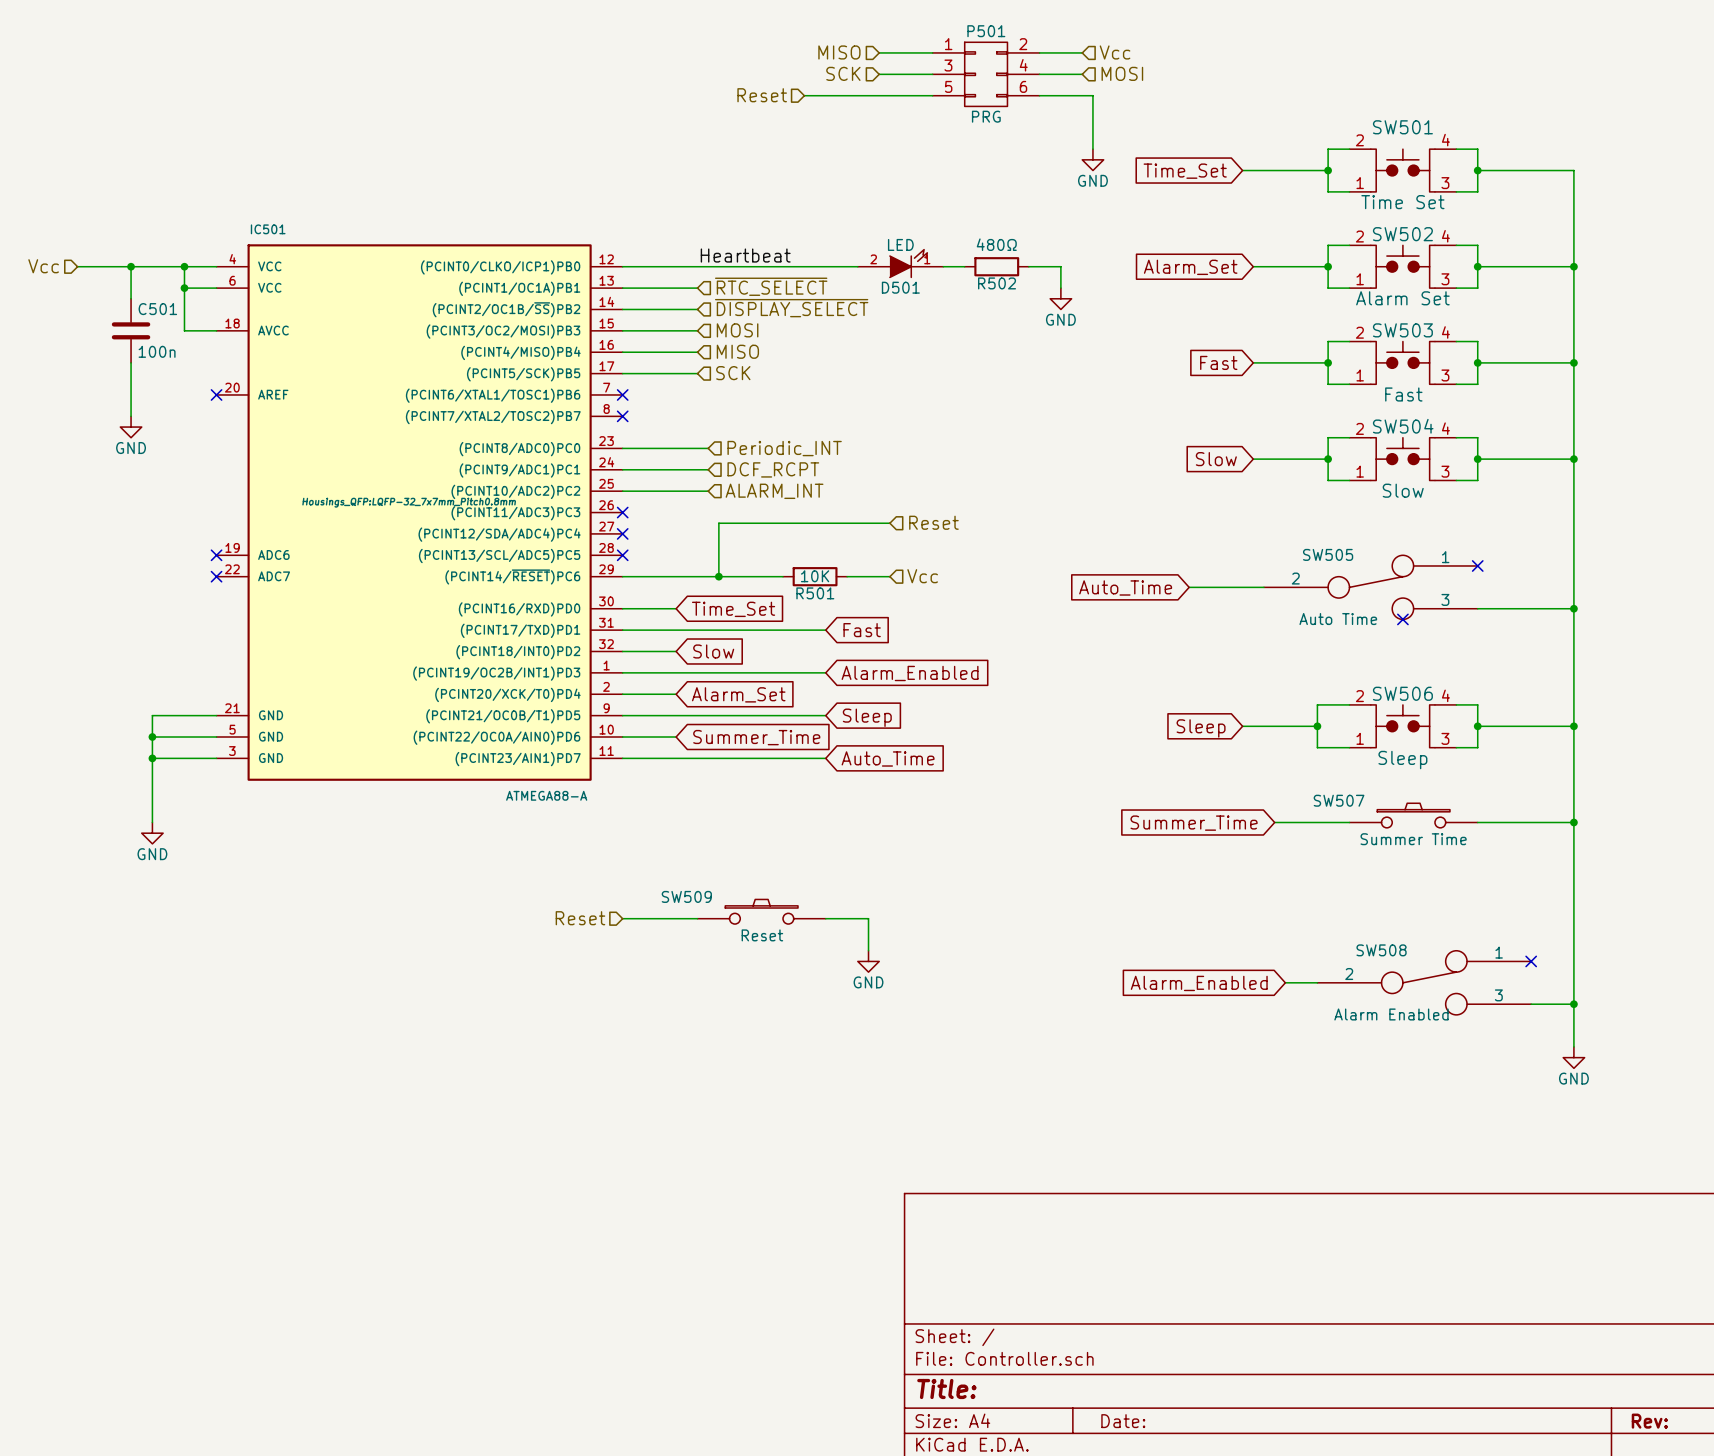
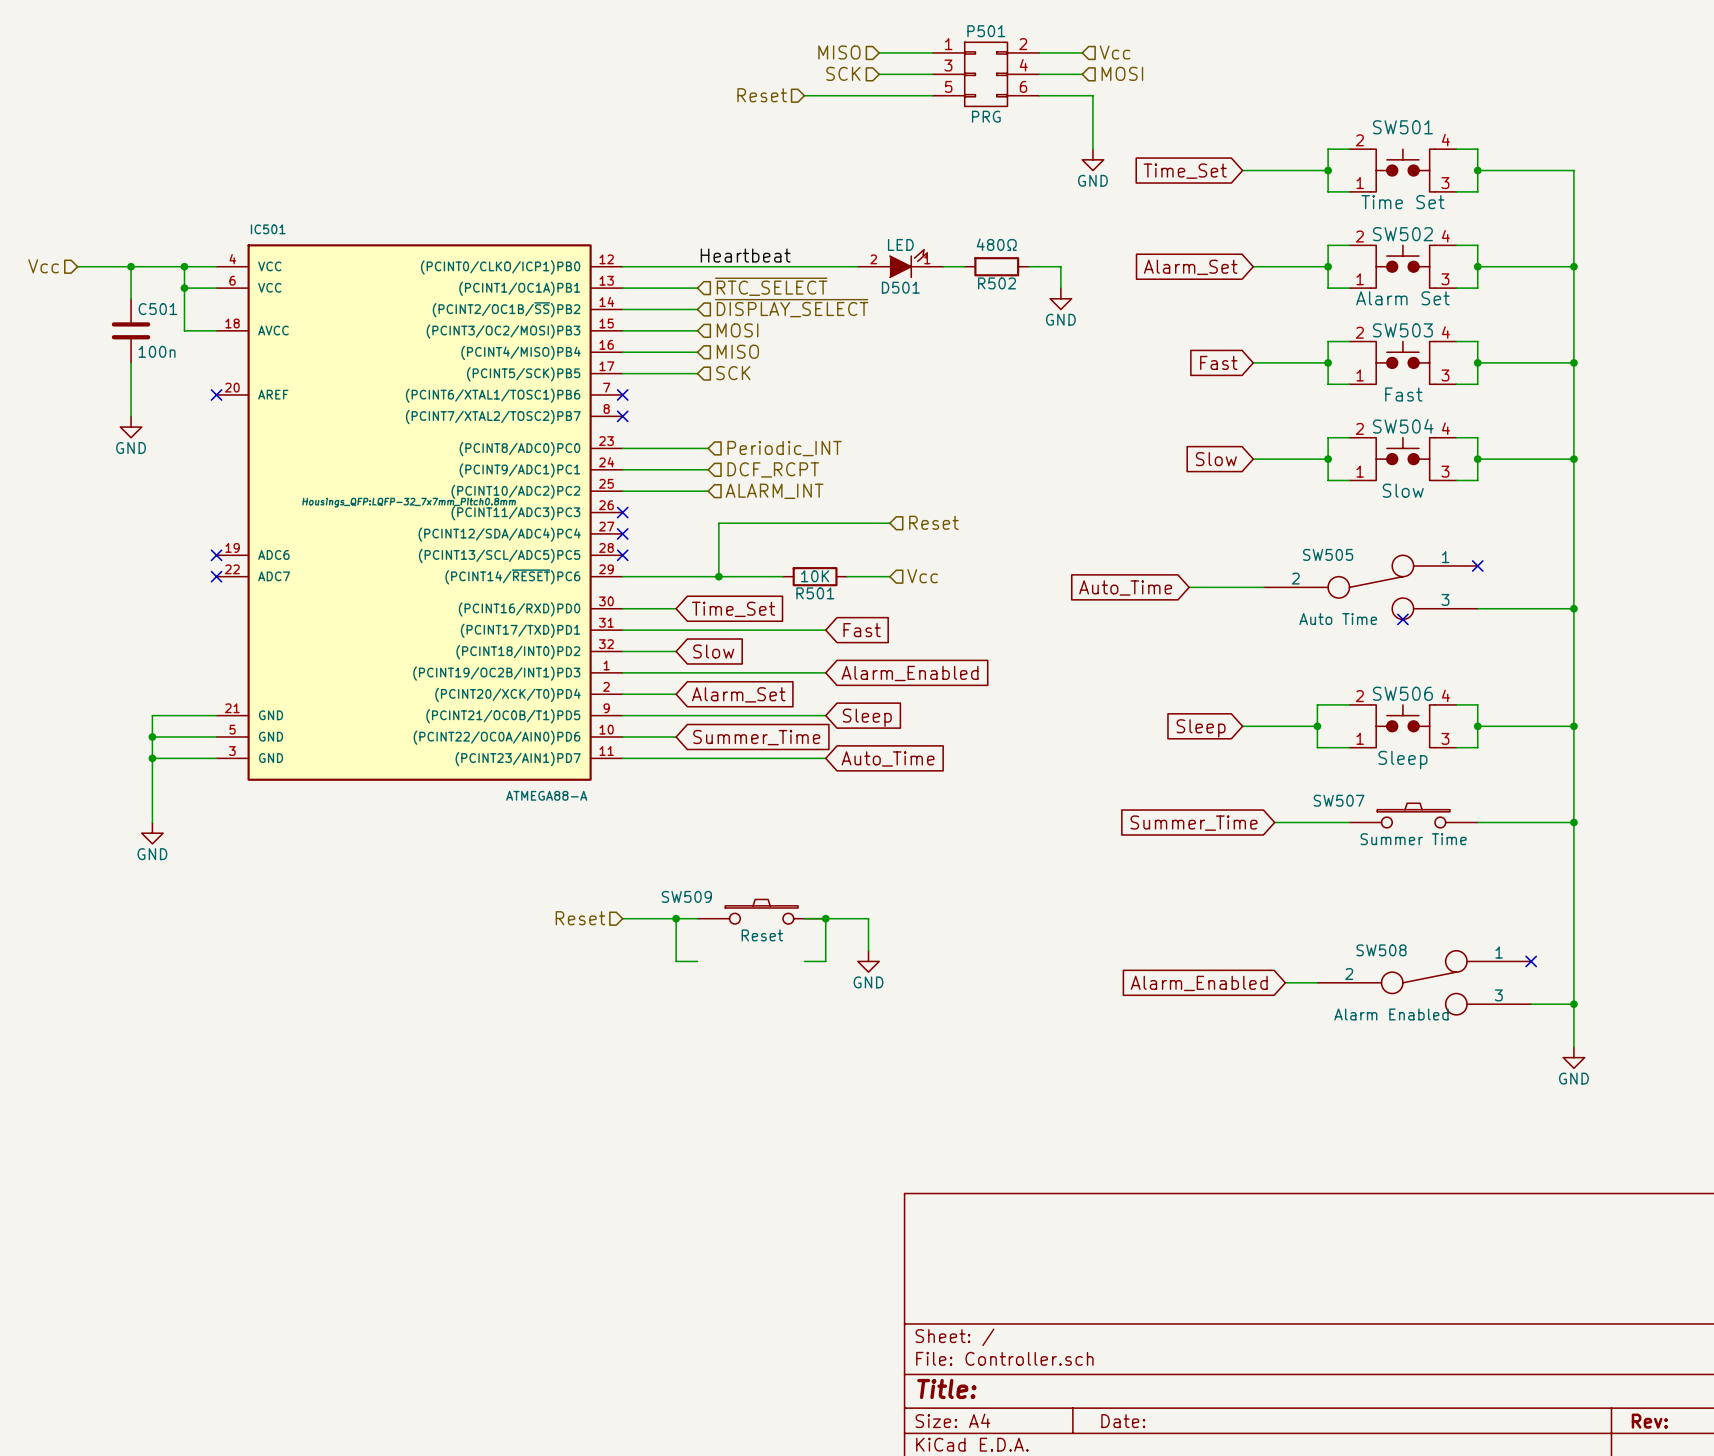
wire: none -> (676, 918) (676, 961) (697, 961)
junction: none -> (676, 918)
wire: none -> (804, 918) (825, 918) (825, 961) (804, 961)
junction: none -> (825, 918)

